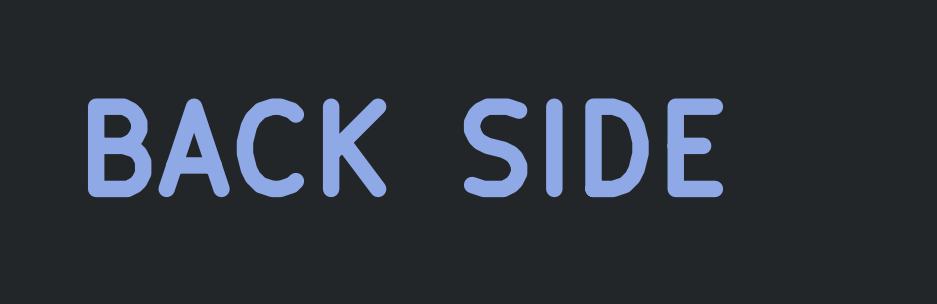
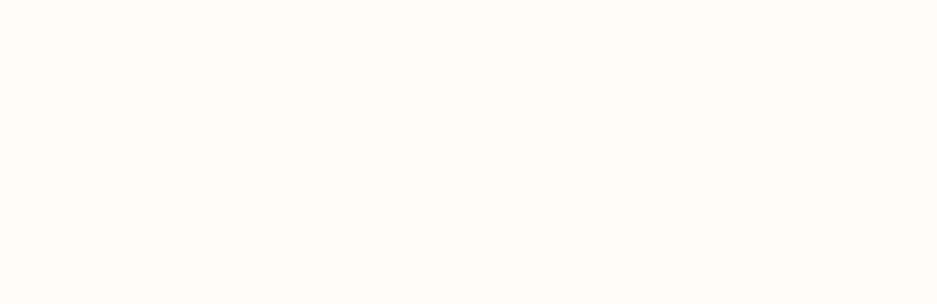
text: BACK SIDE (405, 147) -> none

